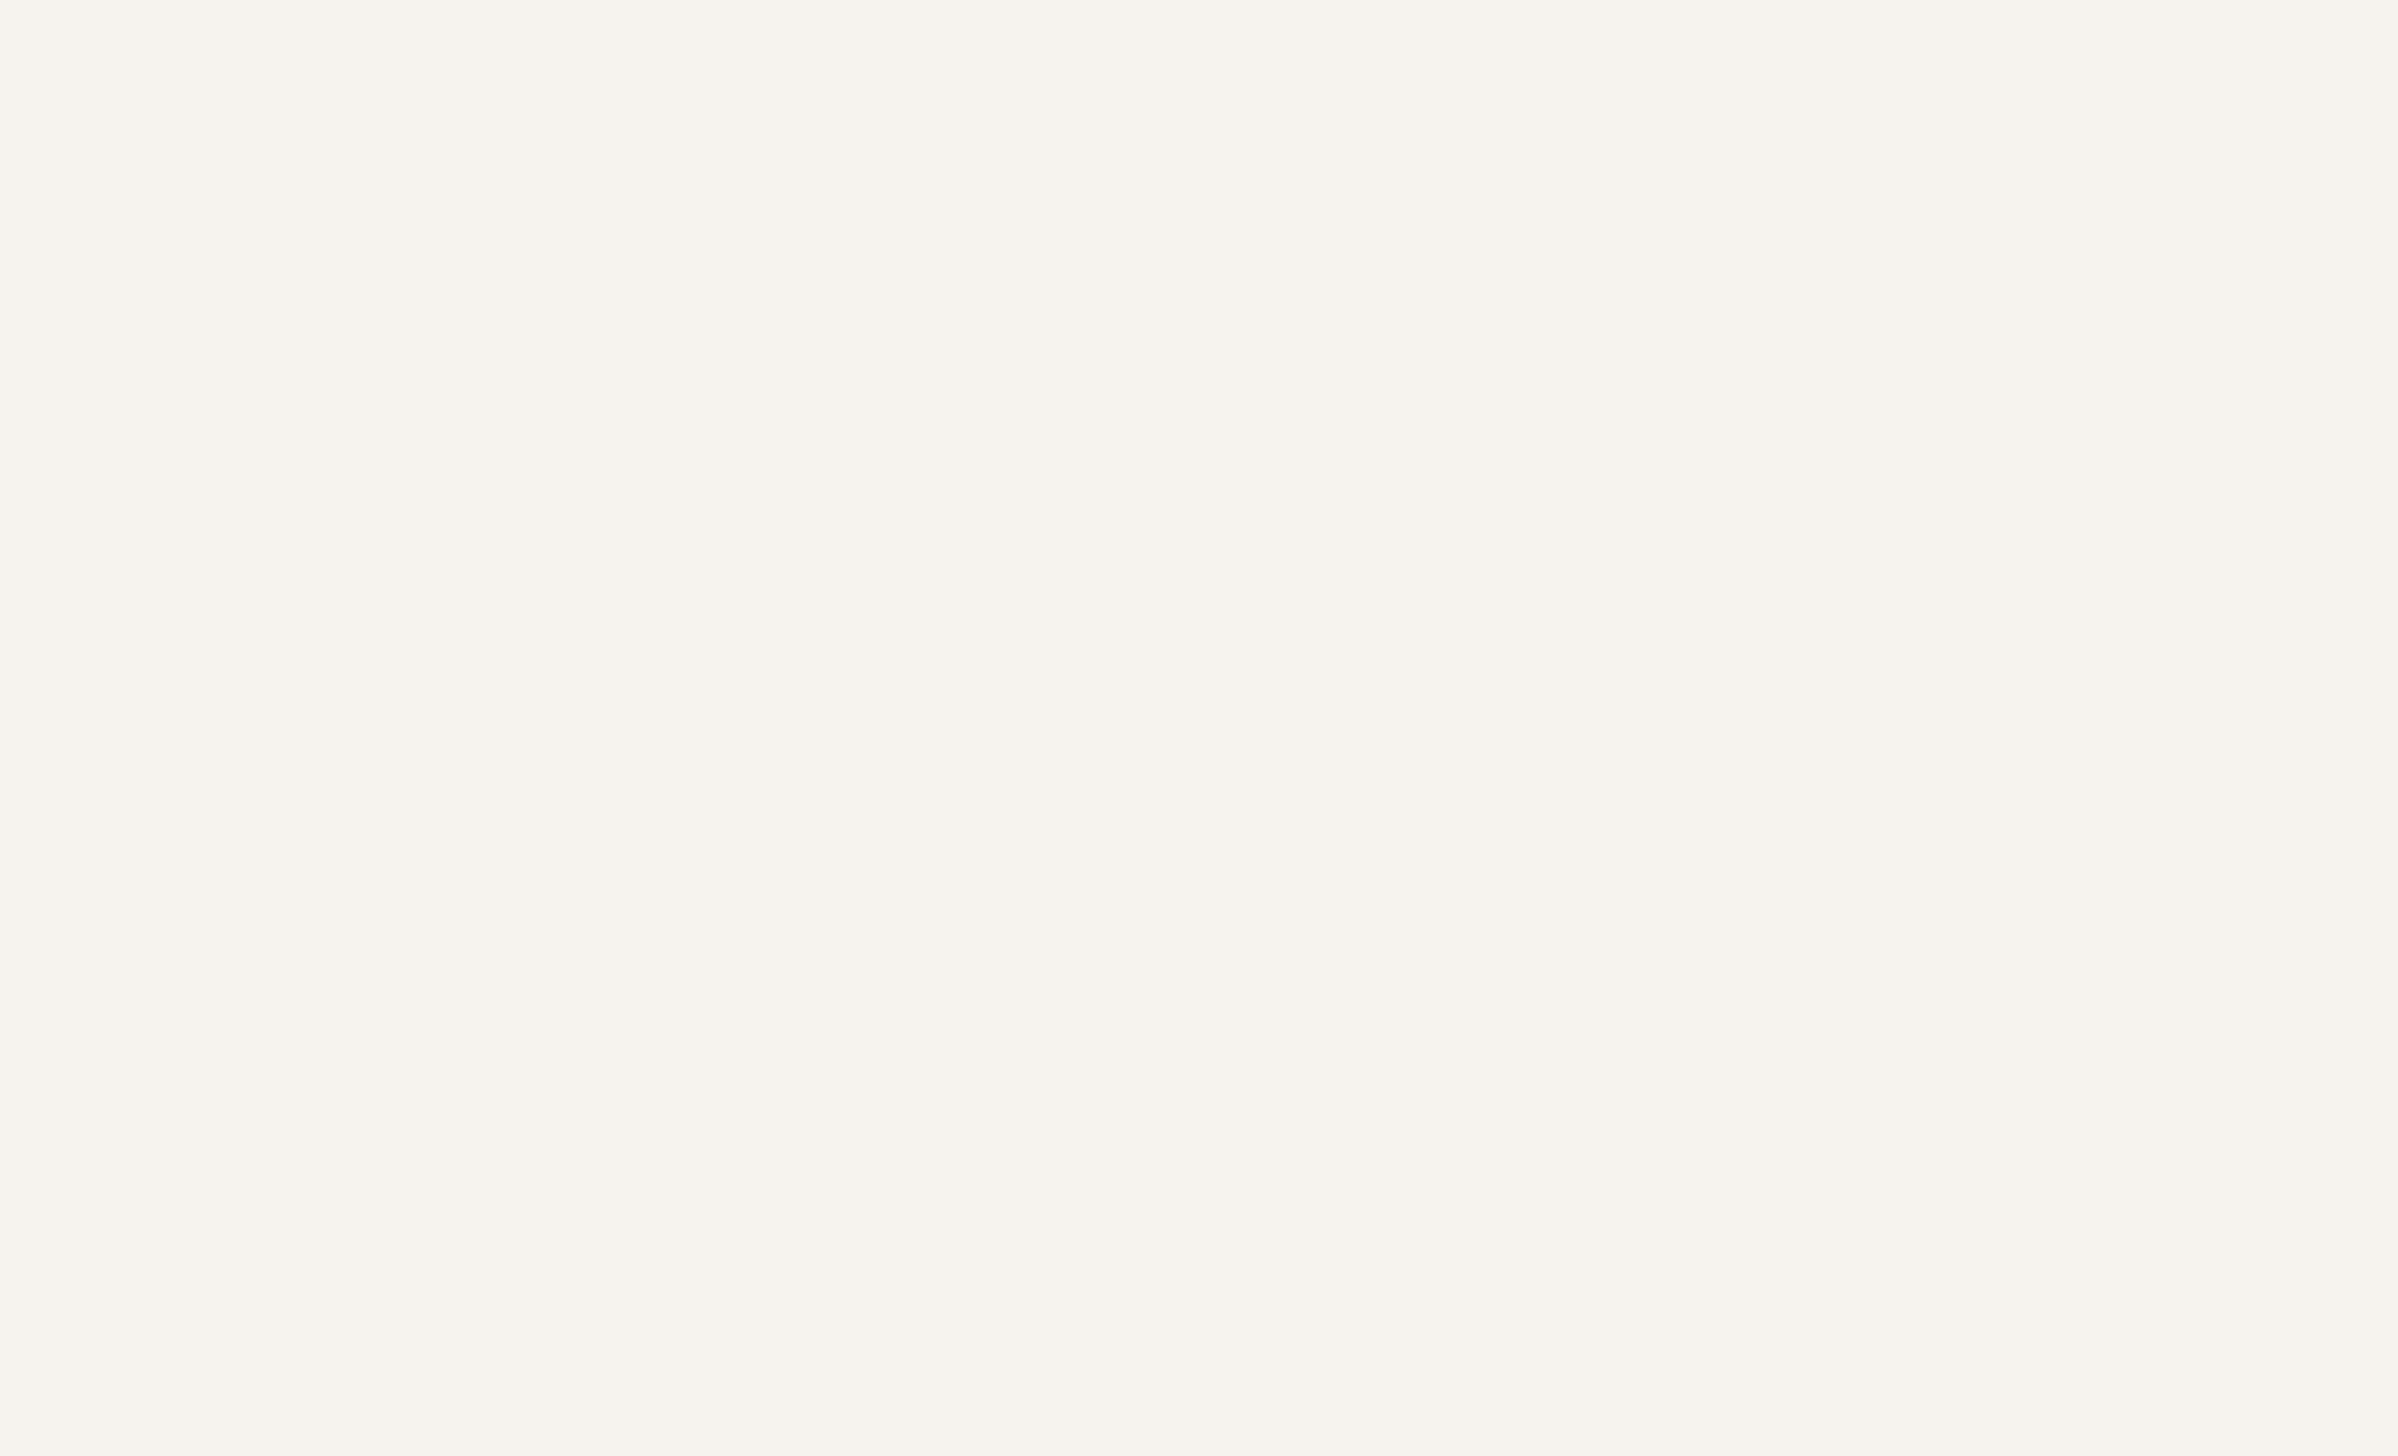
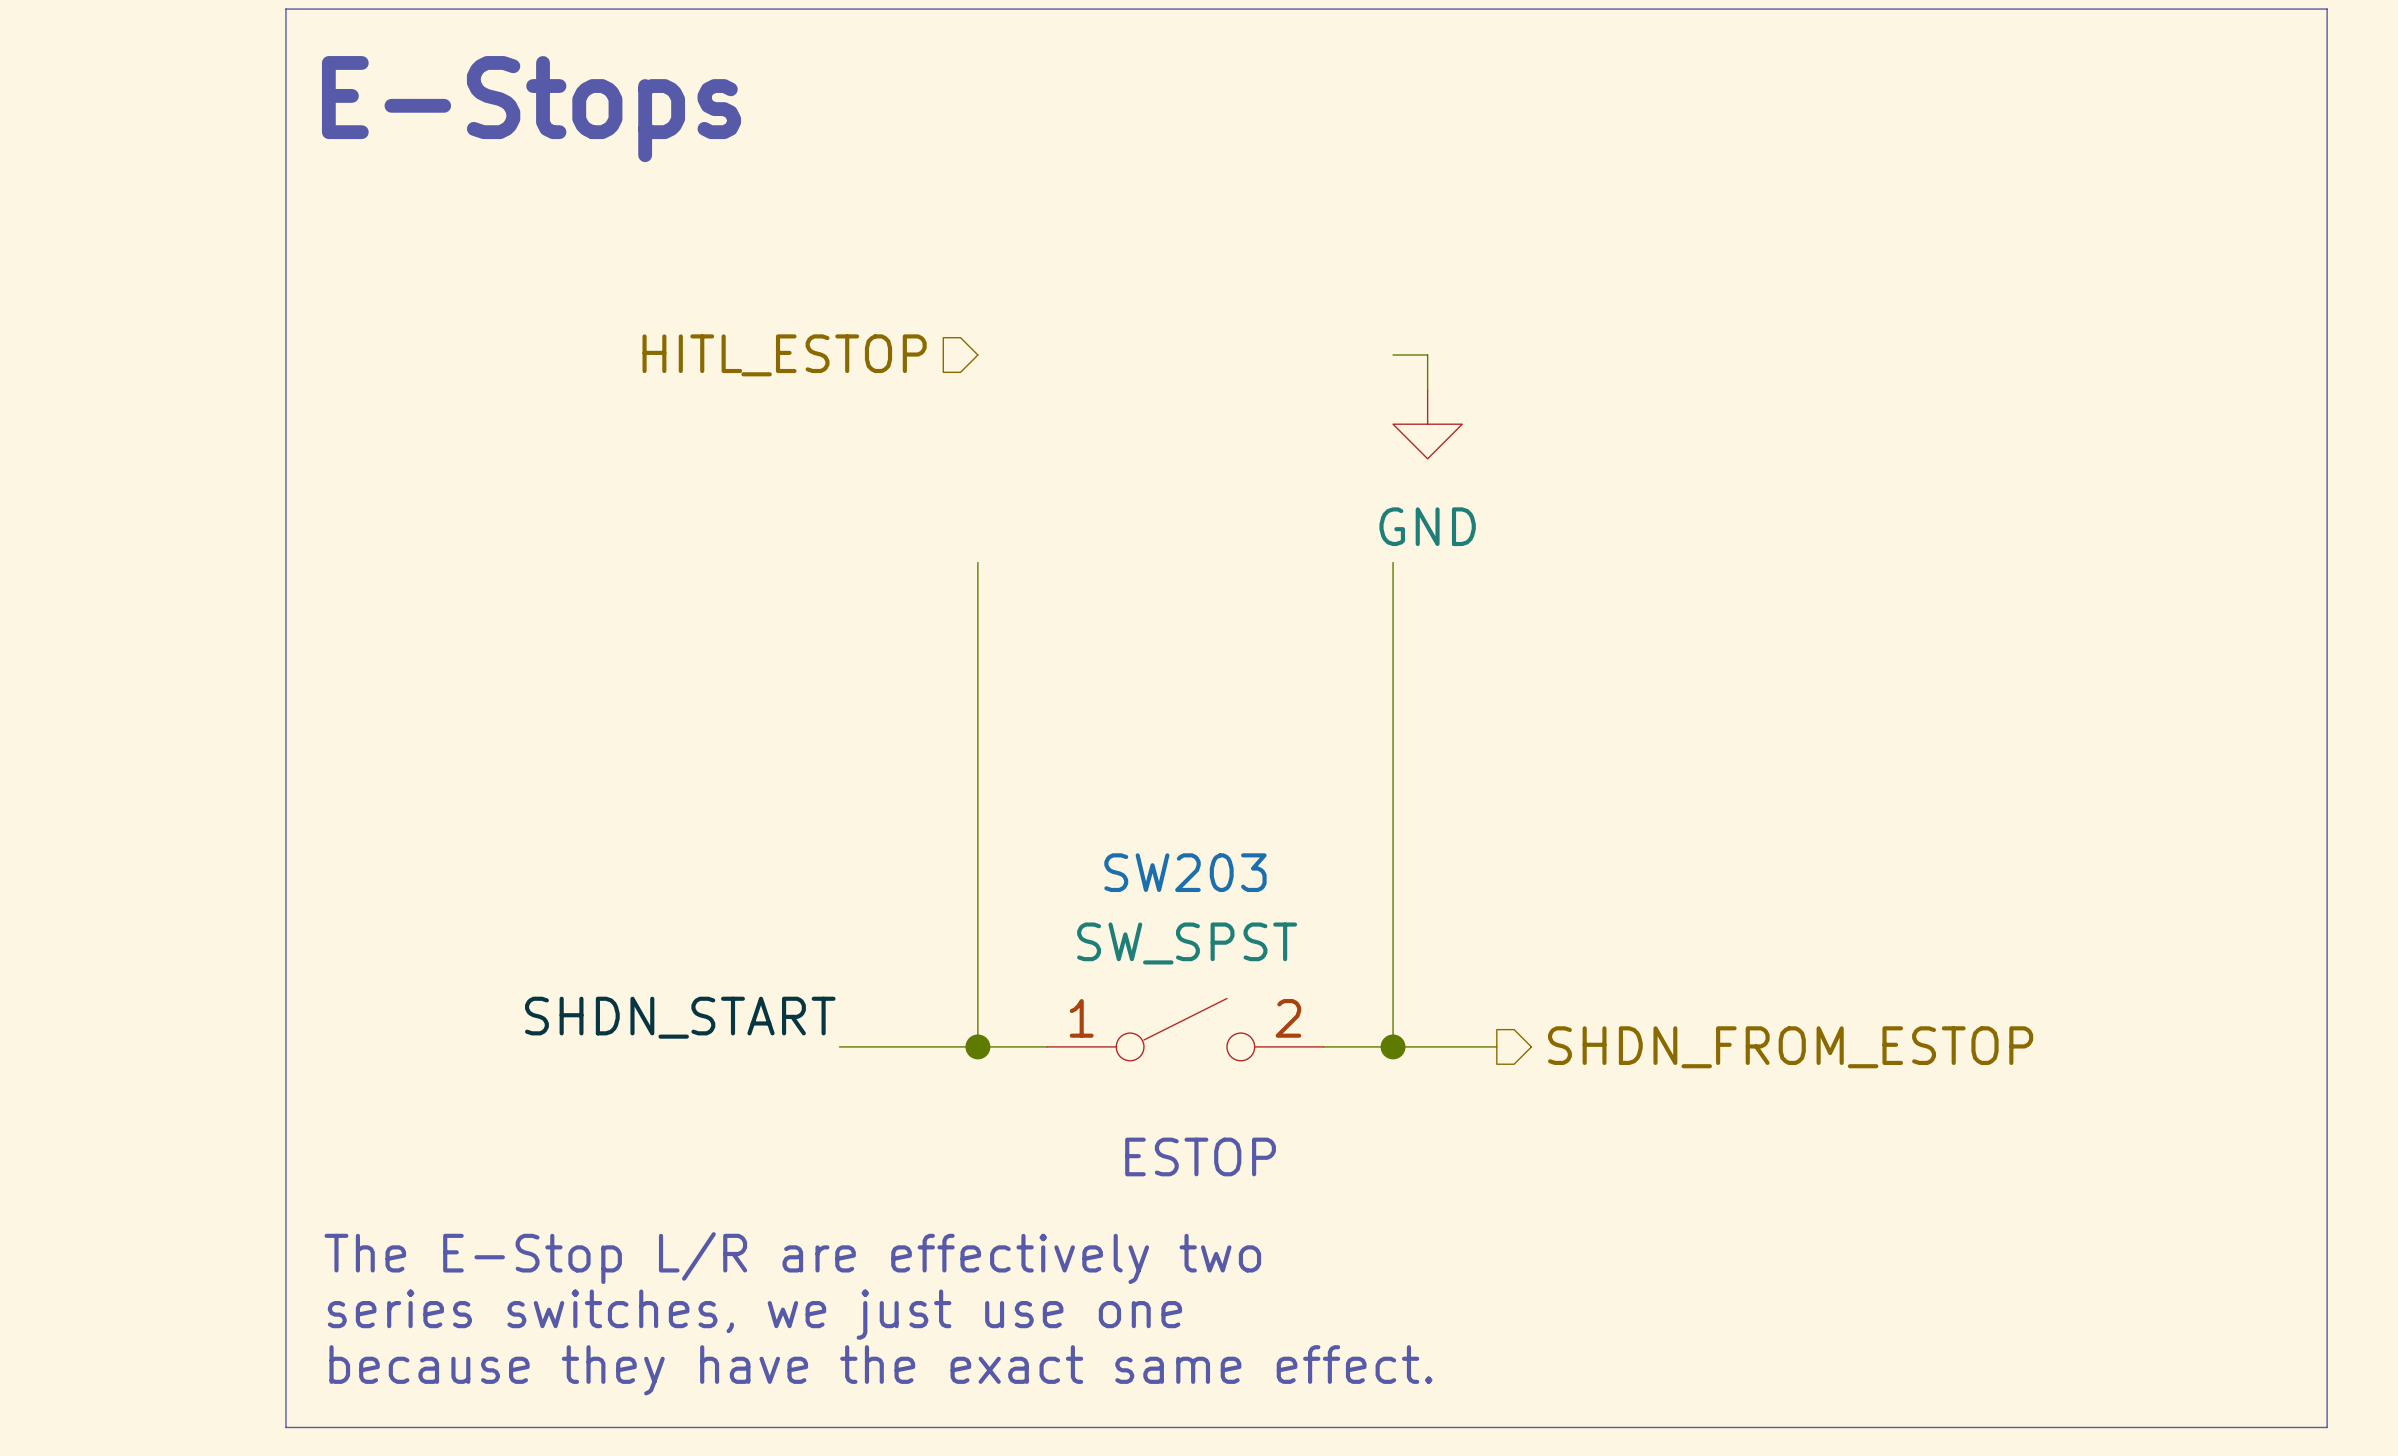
line: none -> (285, 9) (2327, 9) (2327, 1427) (285, 1427) (285, 9)
text: none -> E-Stops (531, 109)
hierarchical label: none -> HITL_ESTOP (784, 355)
wire: none -> (1393, 355) (1427, 355) (1427, 389)
power symbol: none -> GND (1427, 424)
wire: none -> (977, 562) (977, 1046)
wire: none -> (1393, 562) (1393, 1046)
label: none -> SHDN_START (680, 1017)
SW203: none -> SW_SPST (1185, 1029)
wire: none -> (839, 1046) (1047, 1046)
junction: none -> (977, 1046)
wire: none -> (1323, 1046) (1496, 1046)
junction: none -> (1393, 1046)
hierarchical label: none -> SHDN_FROM_ESTOP (1790, 1047)
text: none -> ESTOP (1200, 1156)
text: none -> The E-Stop L/R are effectively two (792, 1258)
text: none -> series switches, we just use one (754, 1314)
text: none -> because they have the exact same effect. (880, 1370)

